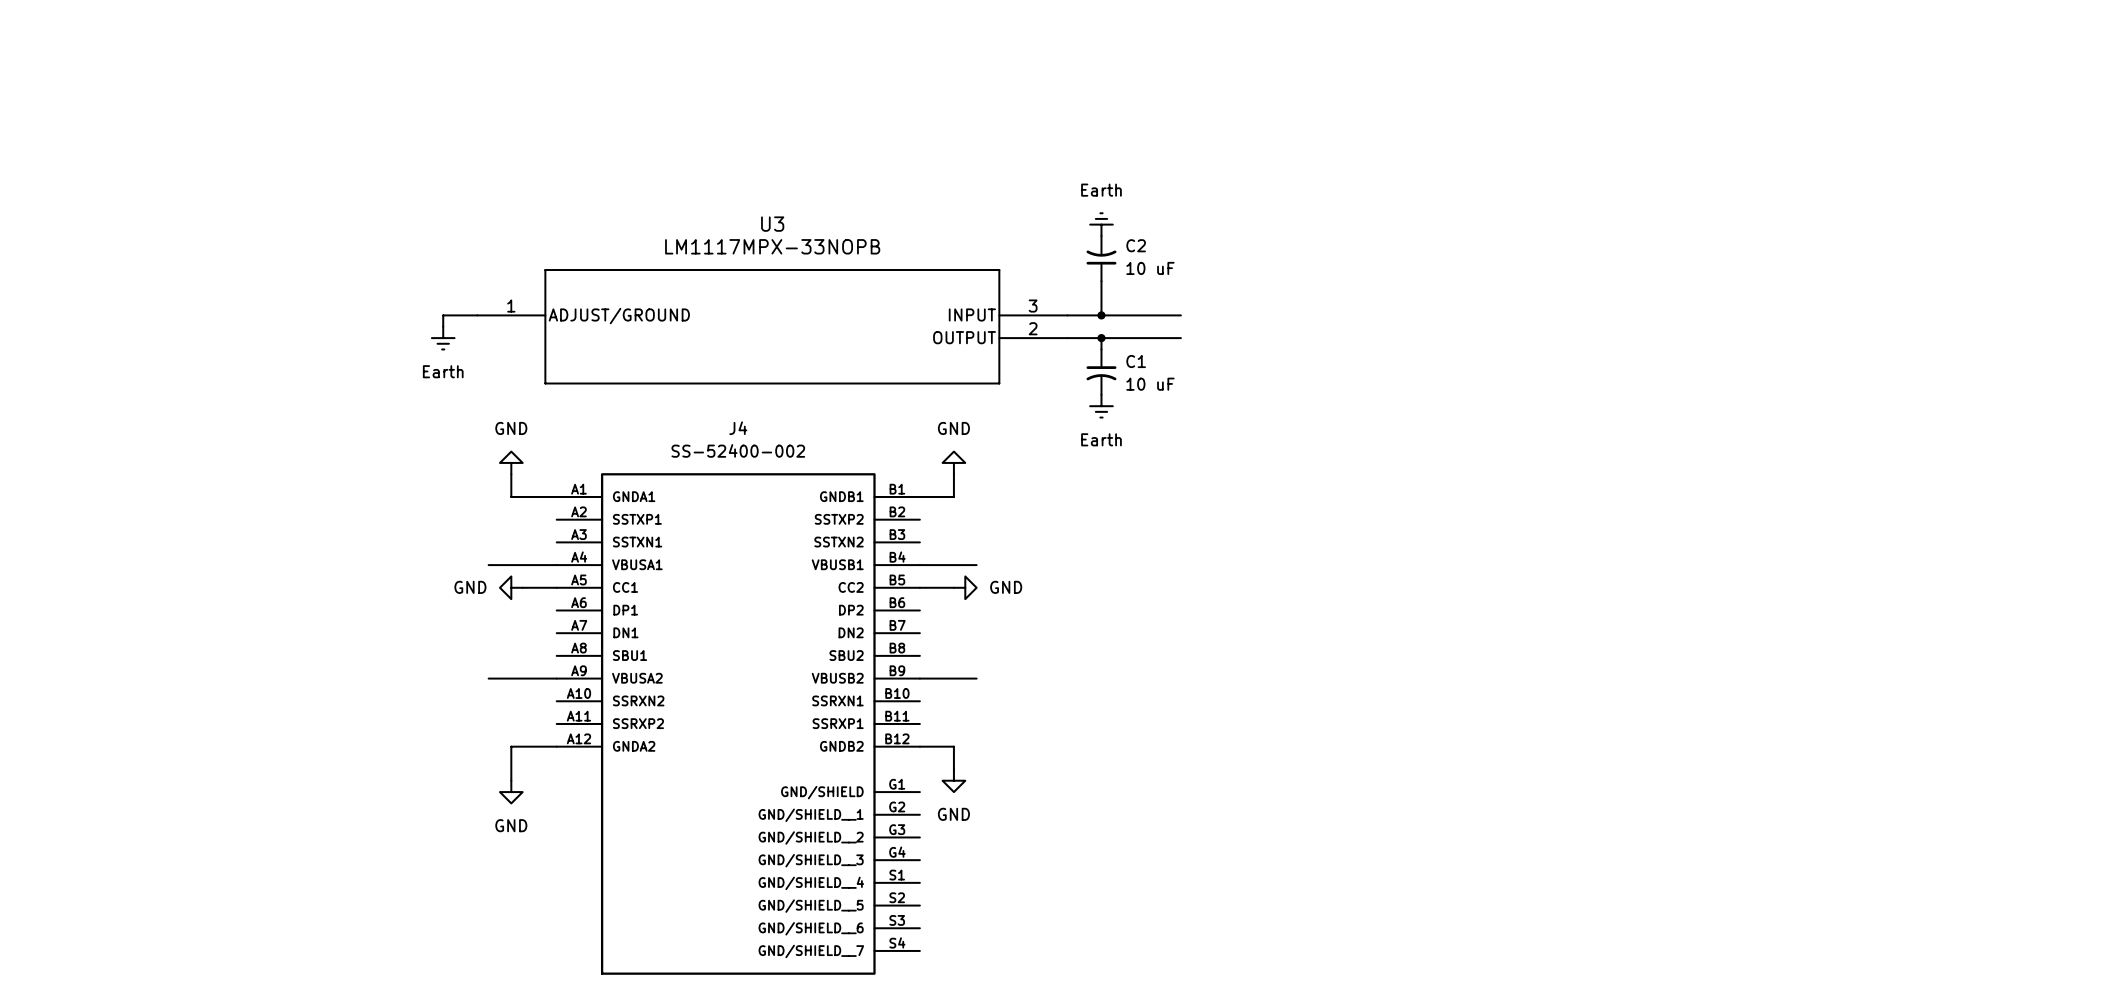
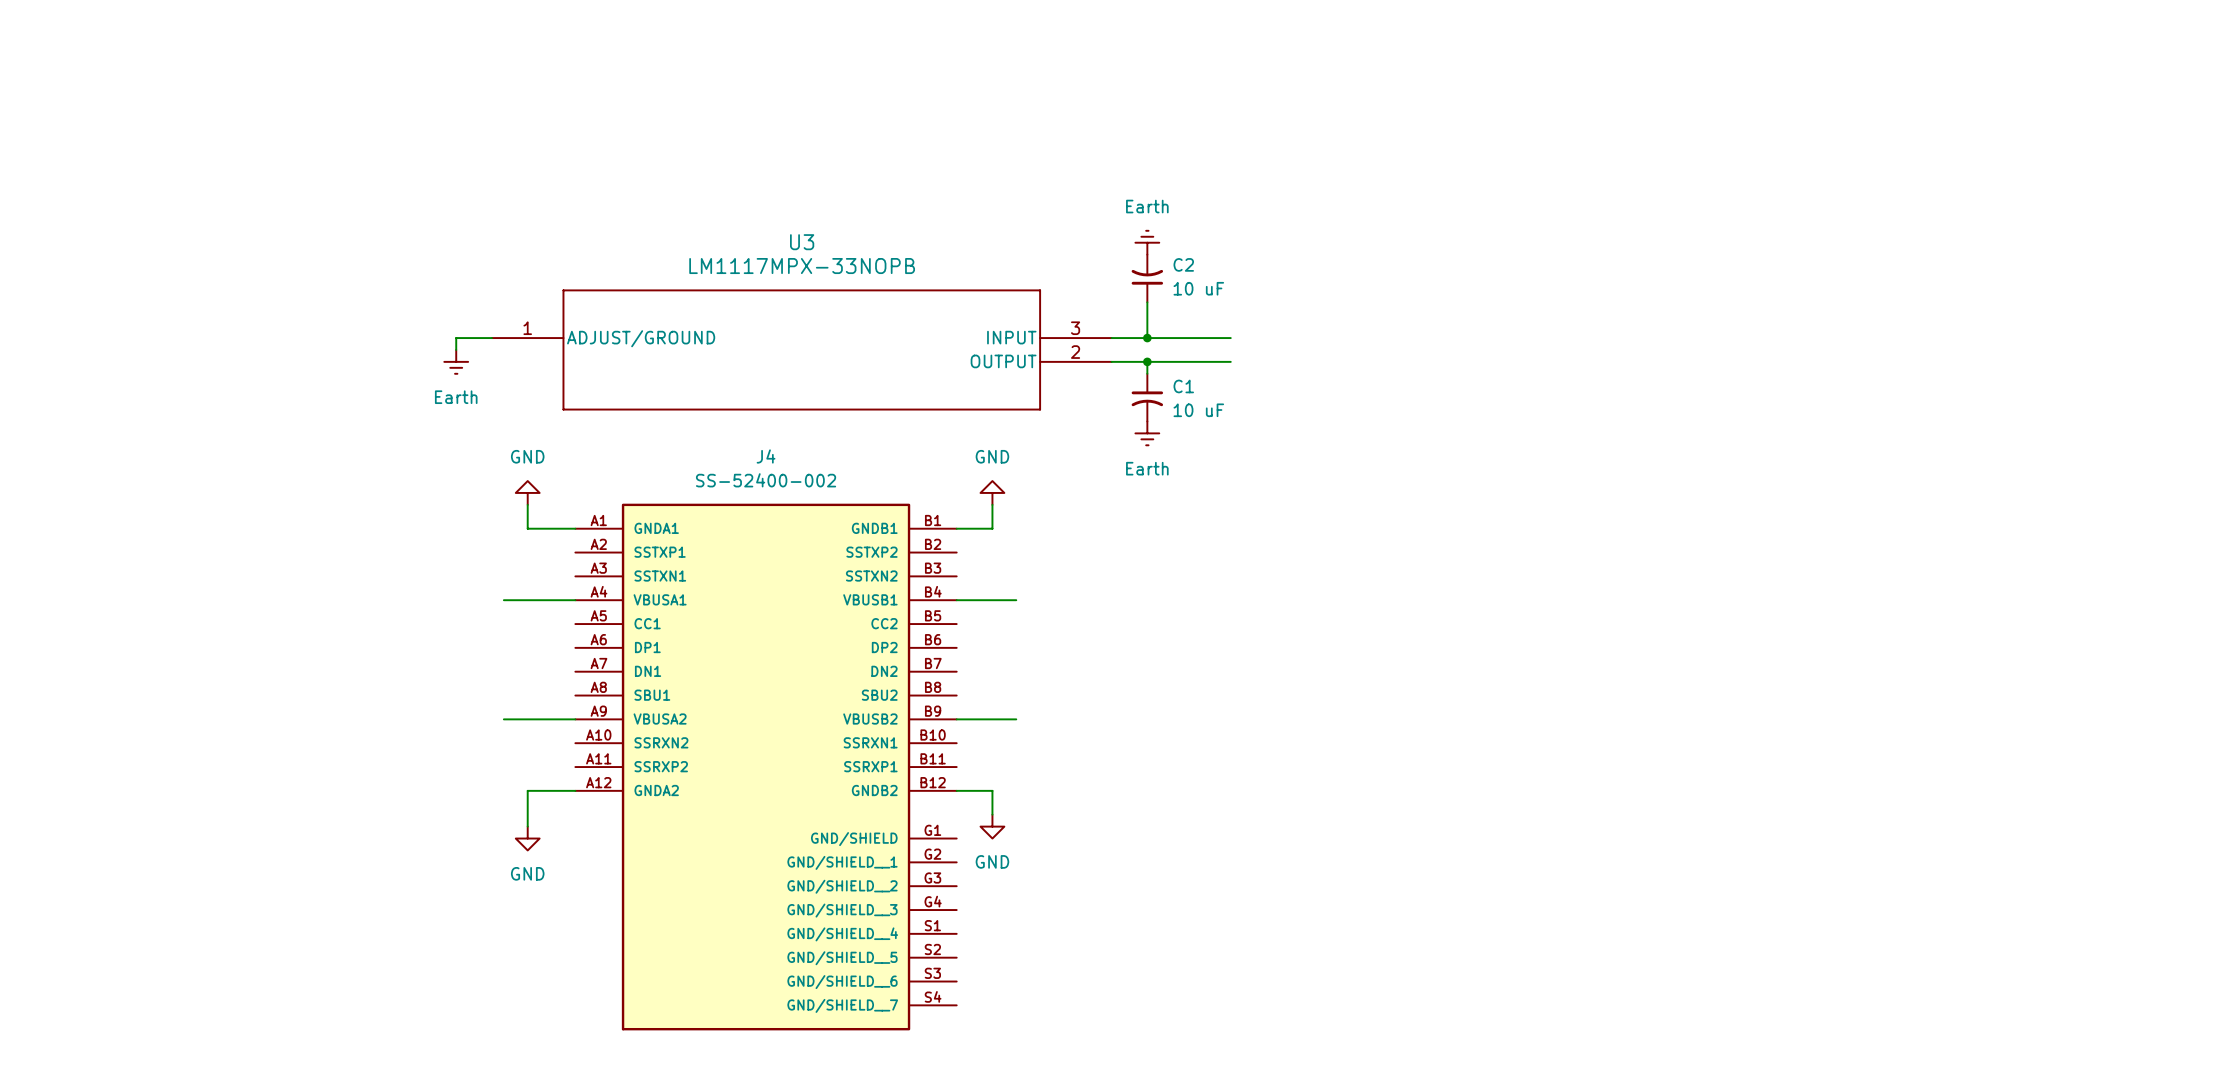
power symbol: GND (511, 587) -> none
wire: (522, 587) (556, 587) -> none
wire: (919, 587) (953, 587) -> none
power symbol: GND (965, 587) -> none

